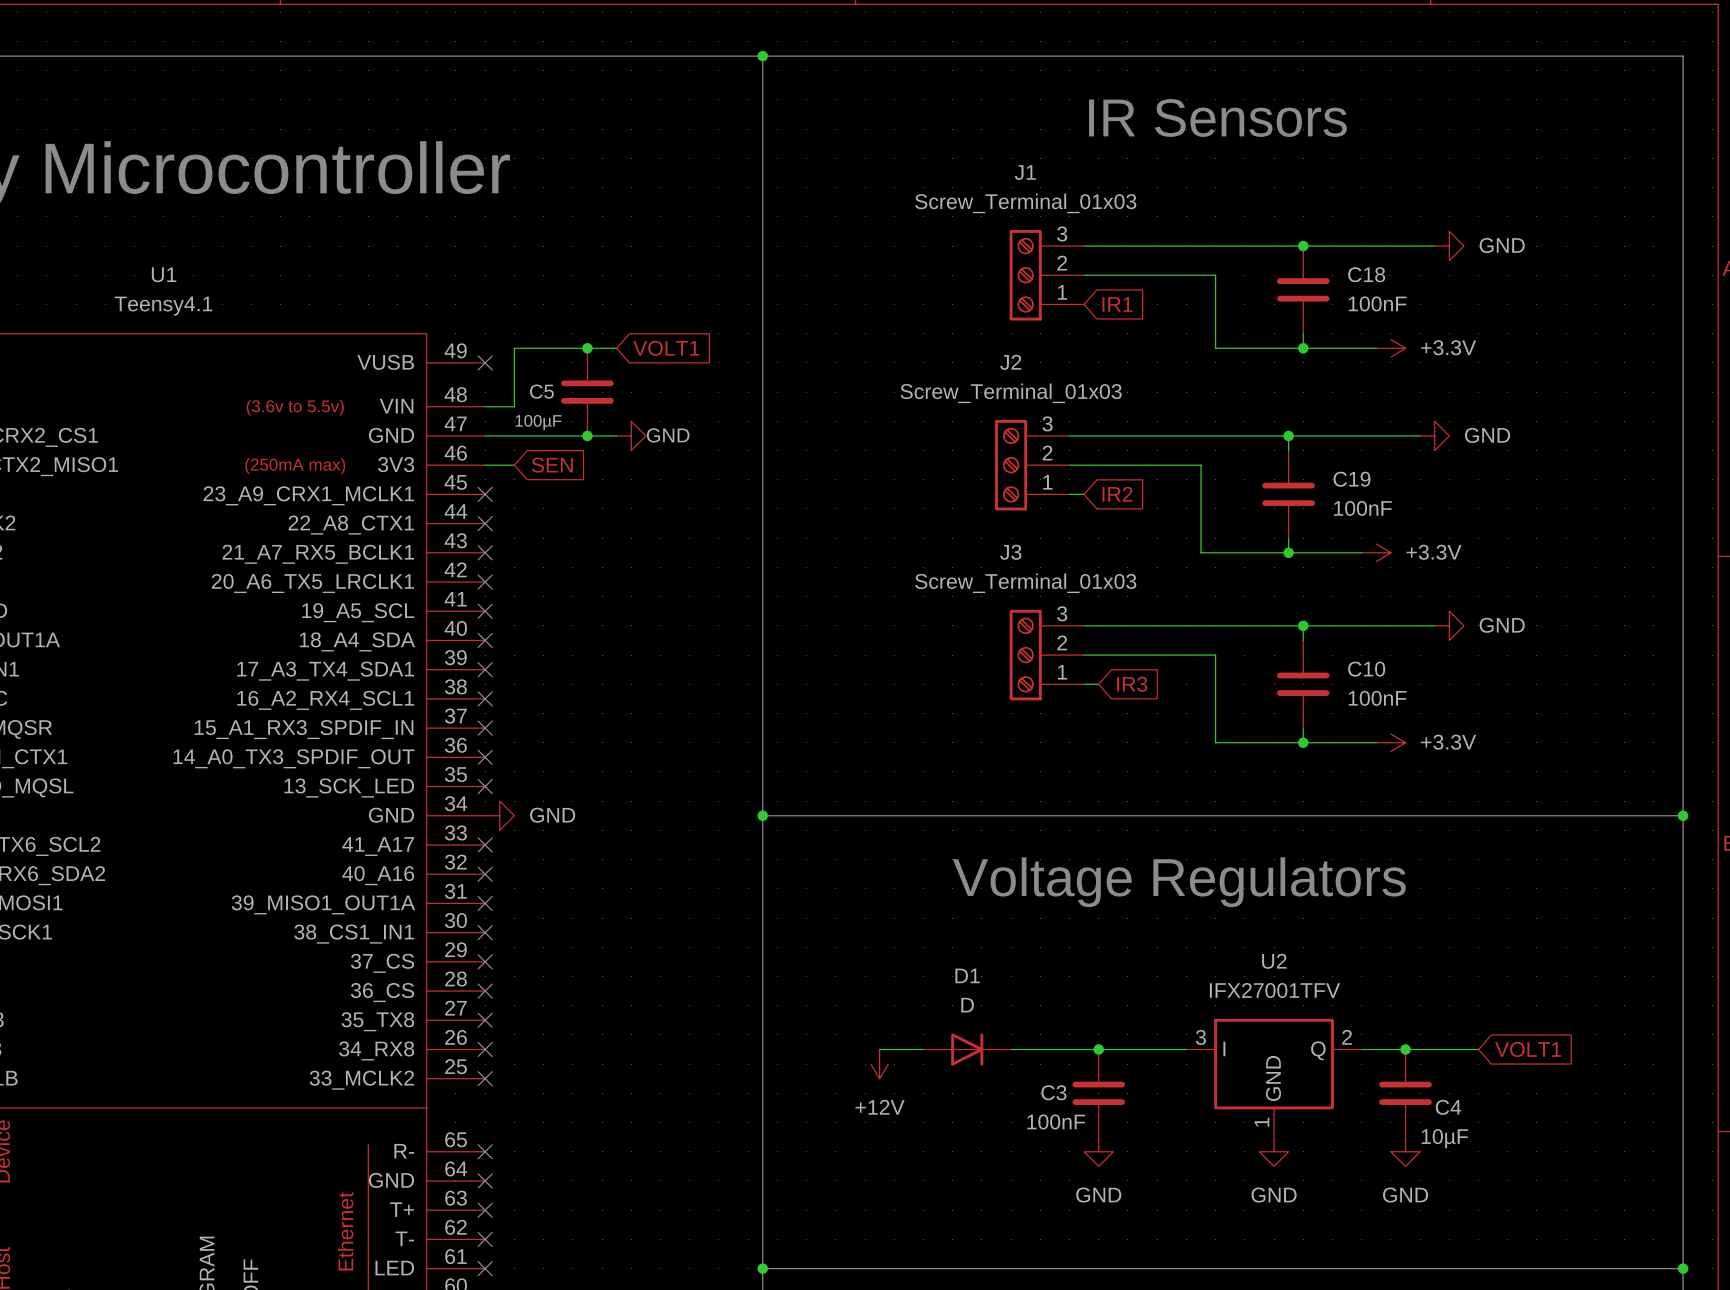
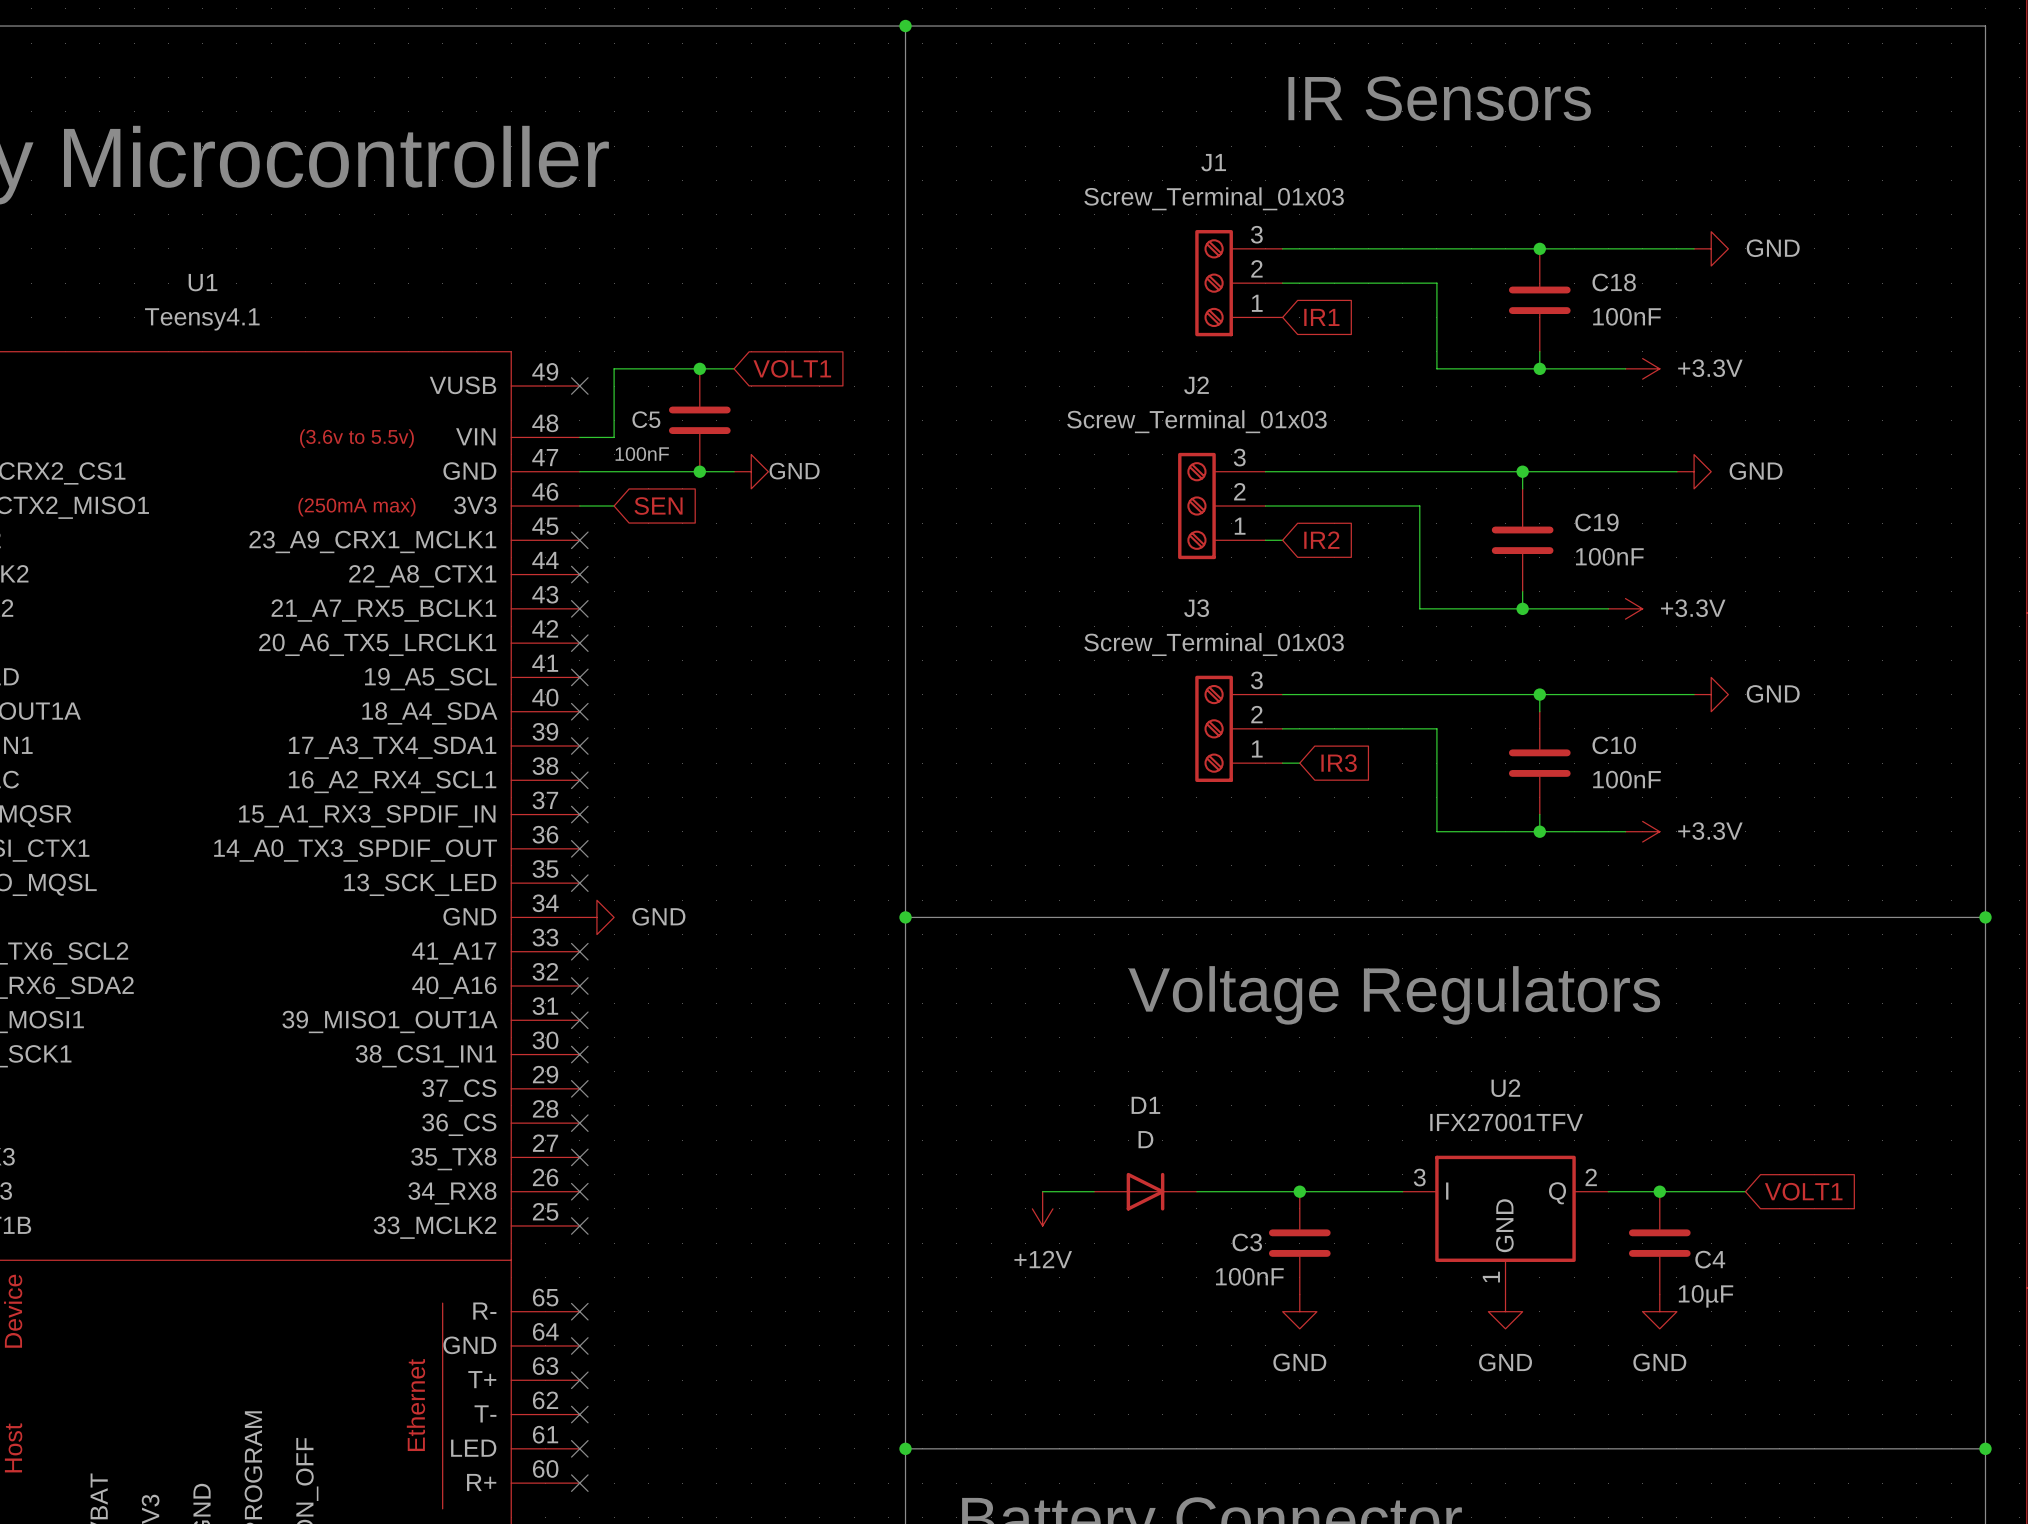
C5 value: 100µF (538, 422) -> 100nF (642, 454)

